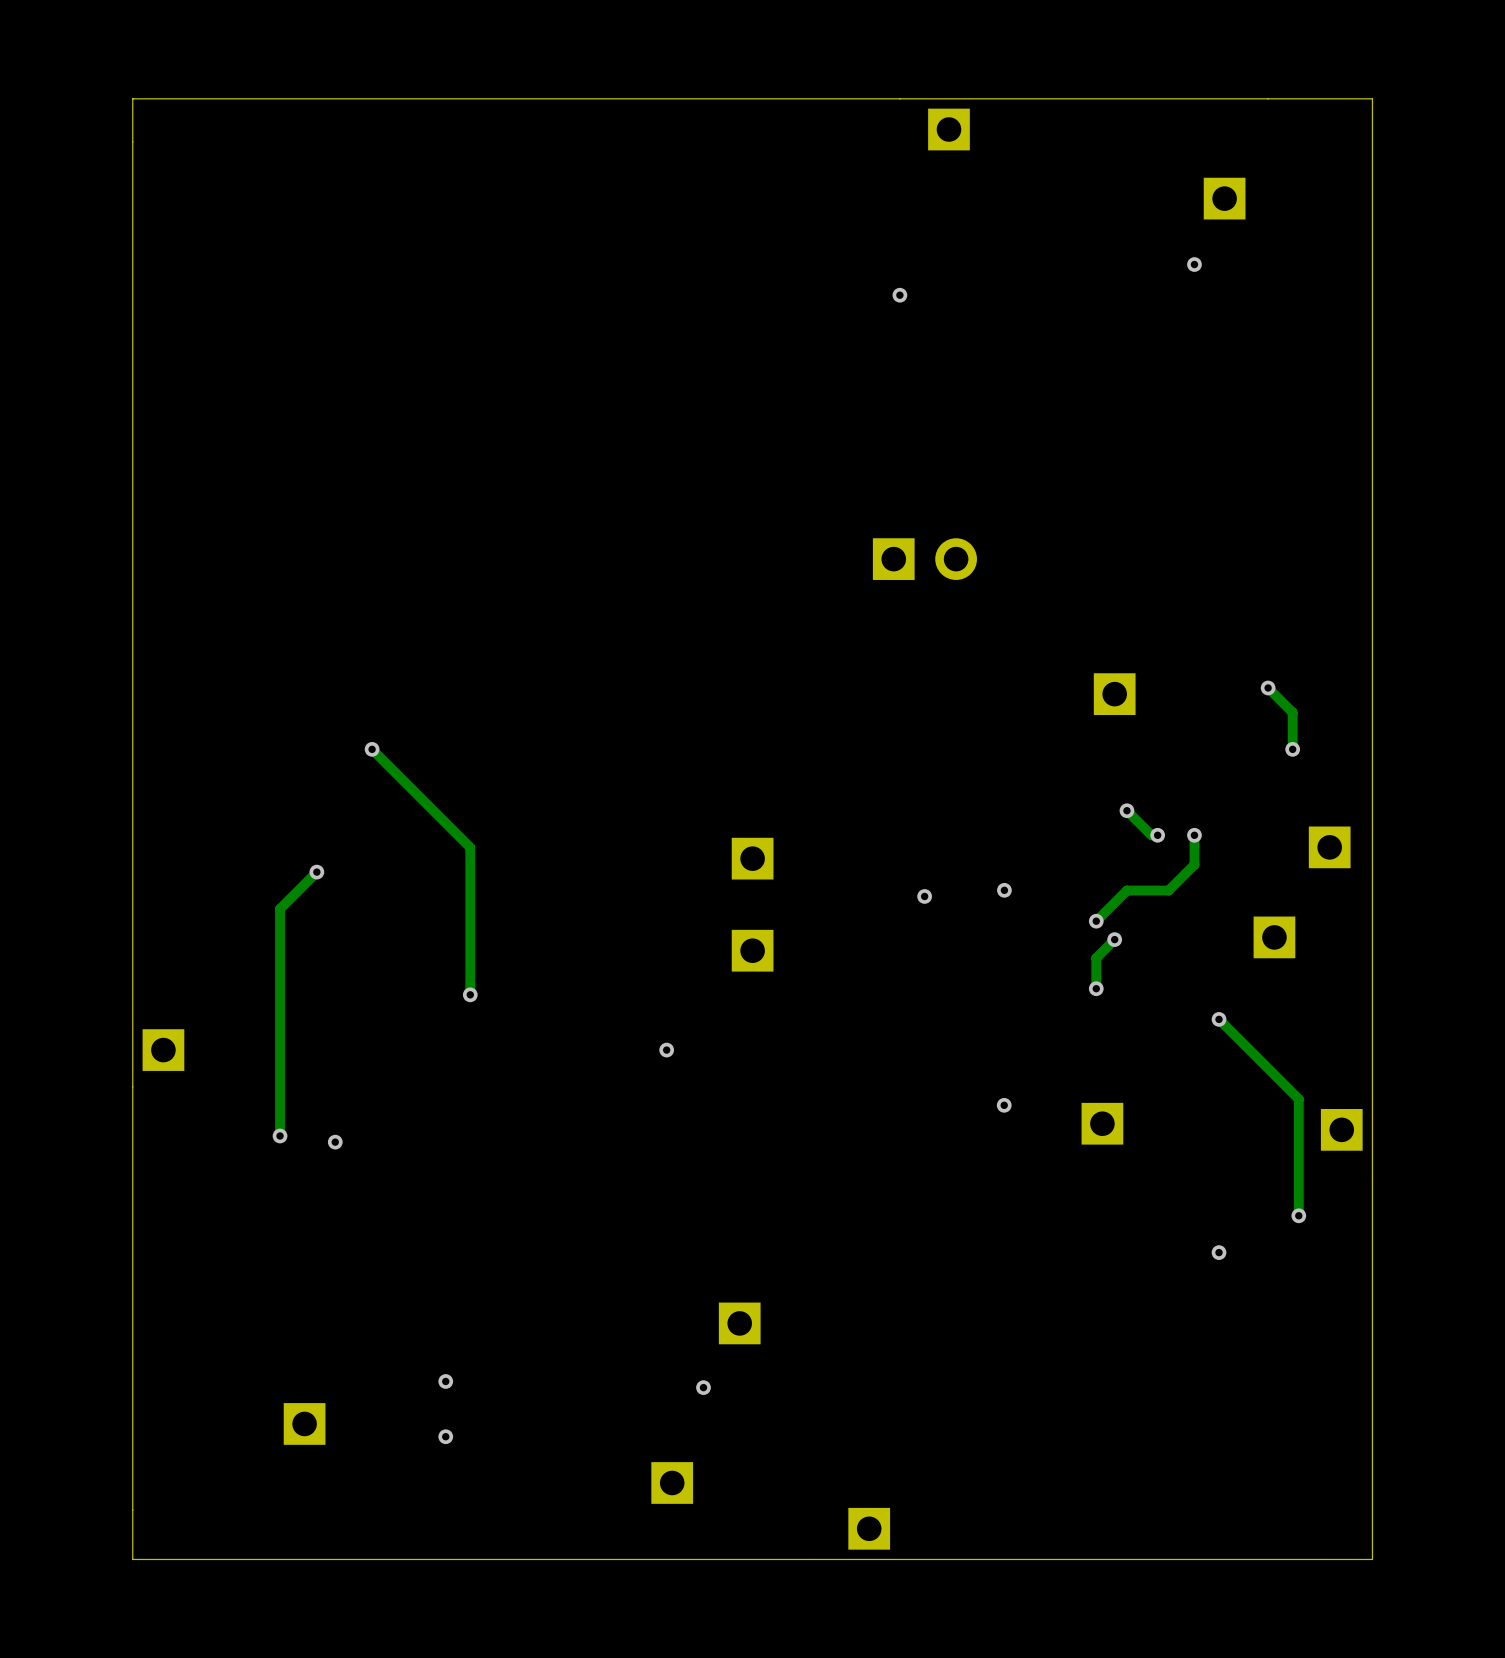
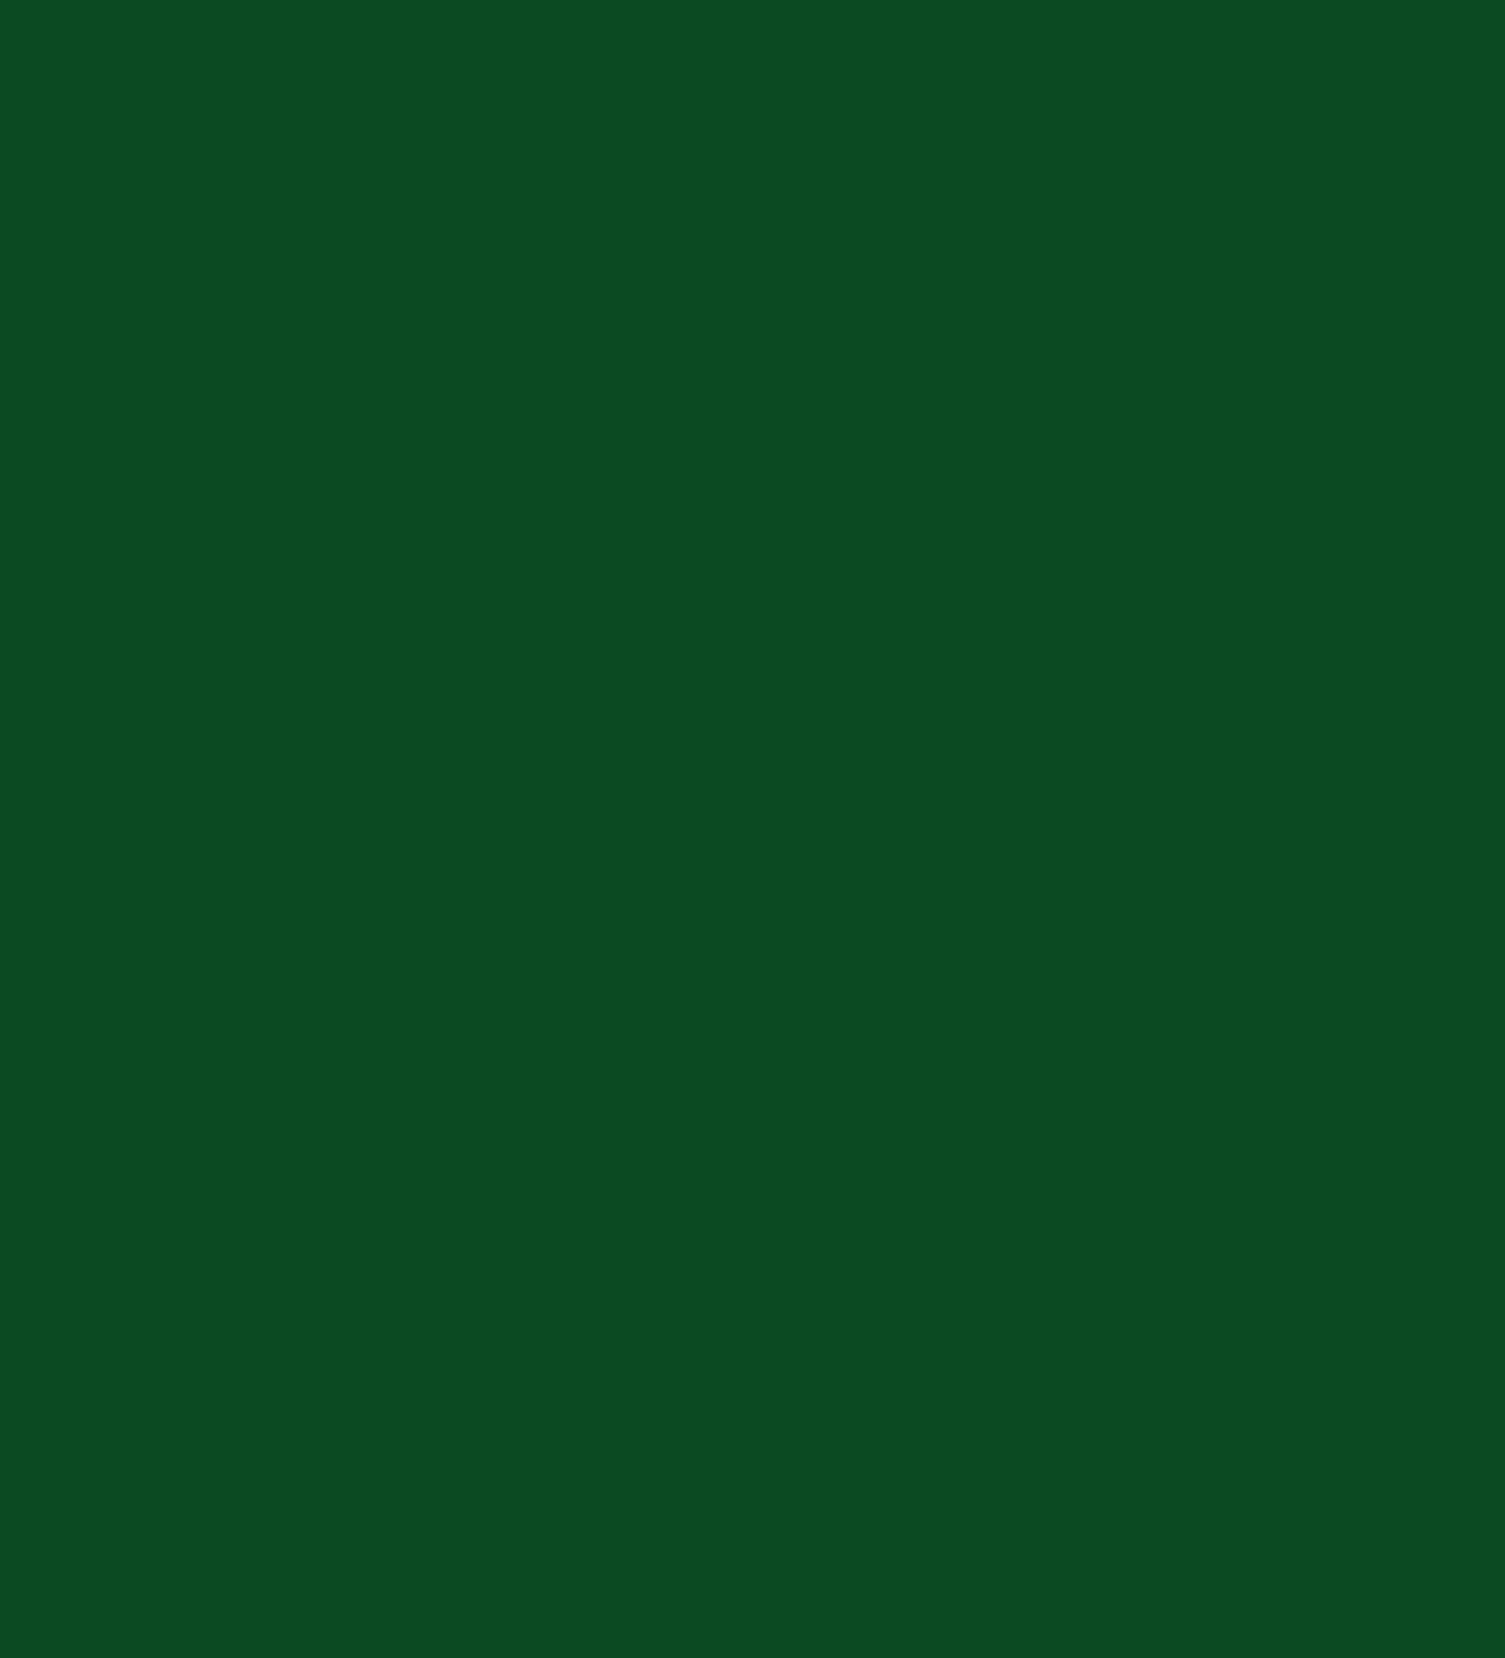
board edge: (1372, 98) (132, 98) (132, 1559) (1372, 1559) (1372, 98) -> none
part: (948, 129) -> none
part: (1224, 198) -> none
via: (1194, 264) -> none
via: (899, 295) -> none
part: (924, 559) -> none
track: (1268, 687) (1292, 712) (1292, 749) -> none
via: (1268, 687) -> none
part: (1114, 694) -> none
track: (372, 749) (470, 847) (470, 994) -> none
via: (372, 749) -> none
via: (1292, 749) -> none
track: (1126, 810) (1151, 835) (1157, 835) -> none
via: (1126, 810) -> none
via: (1157, 835) -> none
track: (1194, 835) (1194, 864) (1168, 890) (1126, 890) (1096, 921) -> none
via: (1194, 835) -> none
part: (1329, 847) -> none
part: (752, 858) -> none
track: (316, 872) (280, 908) (280, 1136) -> none
via: (316, 872) -> none
via: (1004, 890) -> none
via: (924, 896) -> none
via: (1096, 921) -> none
part: (1274, 937) -> none
track: (1114, 939) (1096, 958) (1096, 988) -> none
via: (1114, 939) -> none
part: (752, 950) -> none
via: (1096, 988) -> none
via: (470, 994) -> none
track: (1219, 1019) (1298, 1099) (1298, 1215) -> none
via: (1219, 1019) -> none
part: (163, 1050) -> none
via: (666, 1050) -> none
via: (1004, 1105) -> none
part: (1102, 1123) -> none
part: (1341, 1129) -> none
via: (280, 1136) -> none
via: (335, 1142) -> none
via: (1298, 1215) -> none
via: (1219, 1252) -> none
part: (739, 1323) -> none
via: (445, 1381) -> none
via: (703, 1387) -> none
part: (304, 1423) -> none
via: (445, 1436) -> none
part: (672, 1482) -> none
part: (869, 1528) -> none

